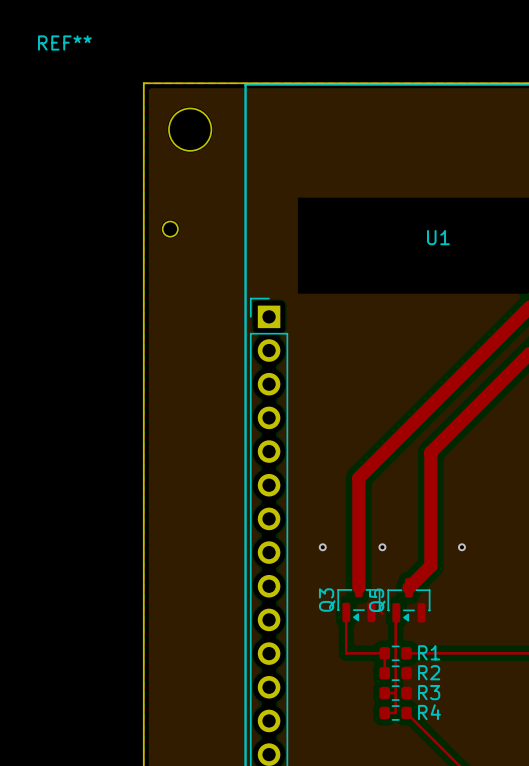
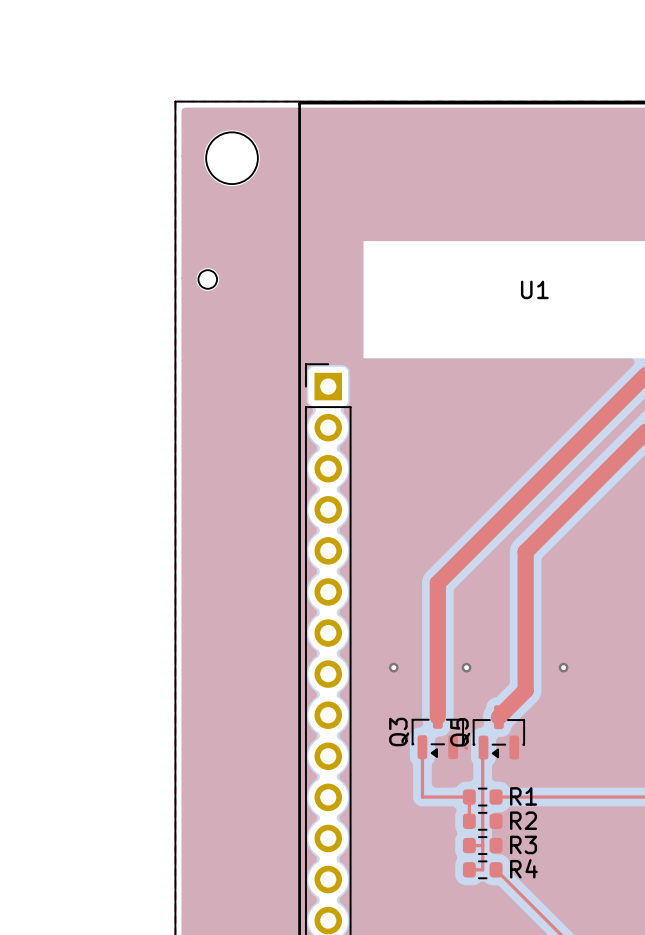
REF** name: REF** (64, 43) -> none

